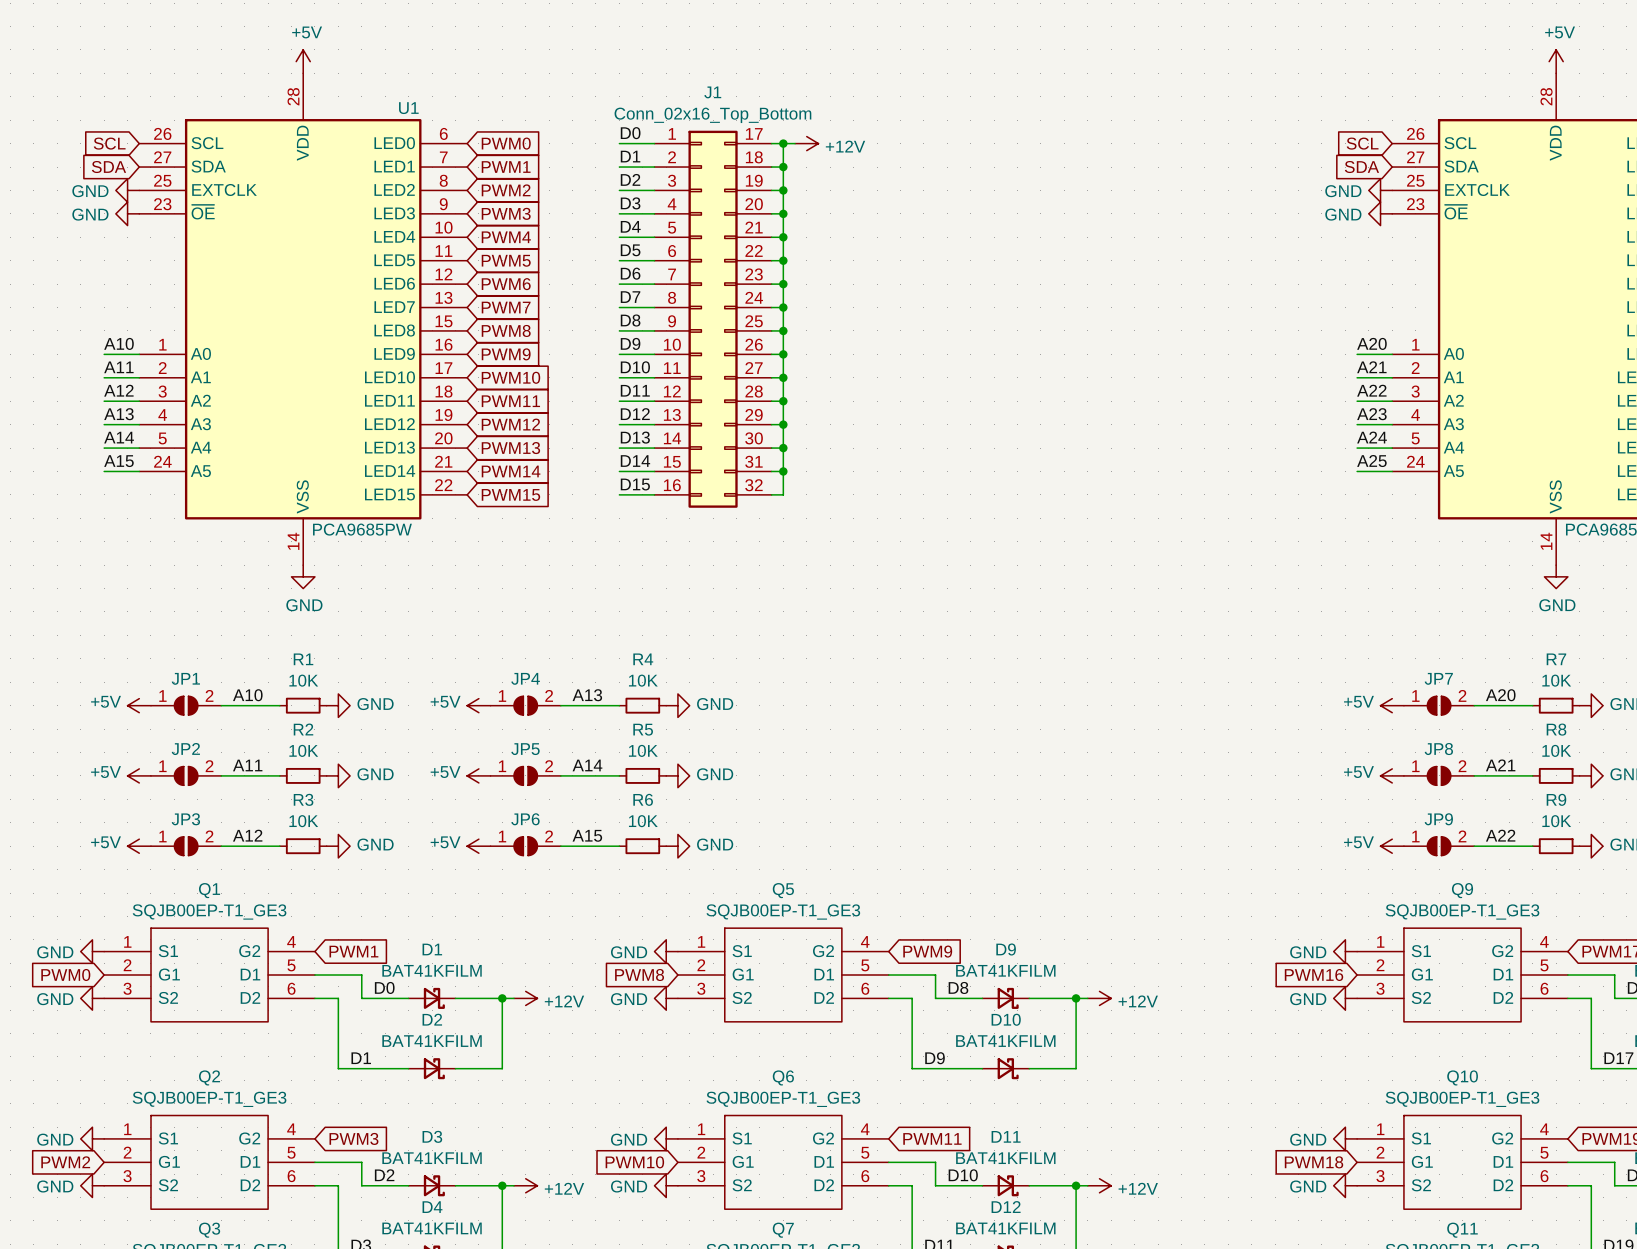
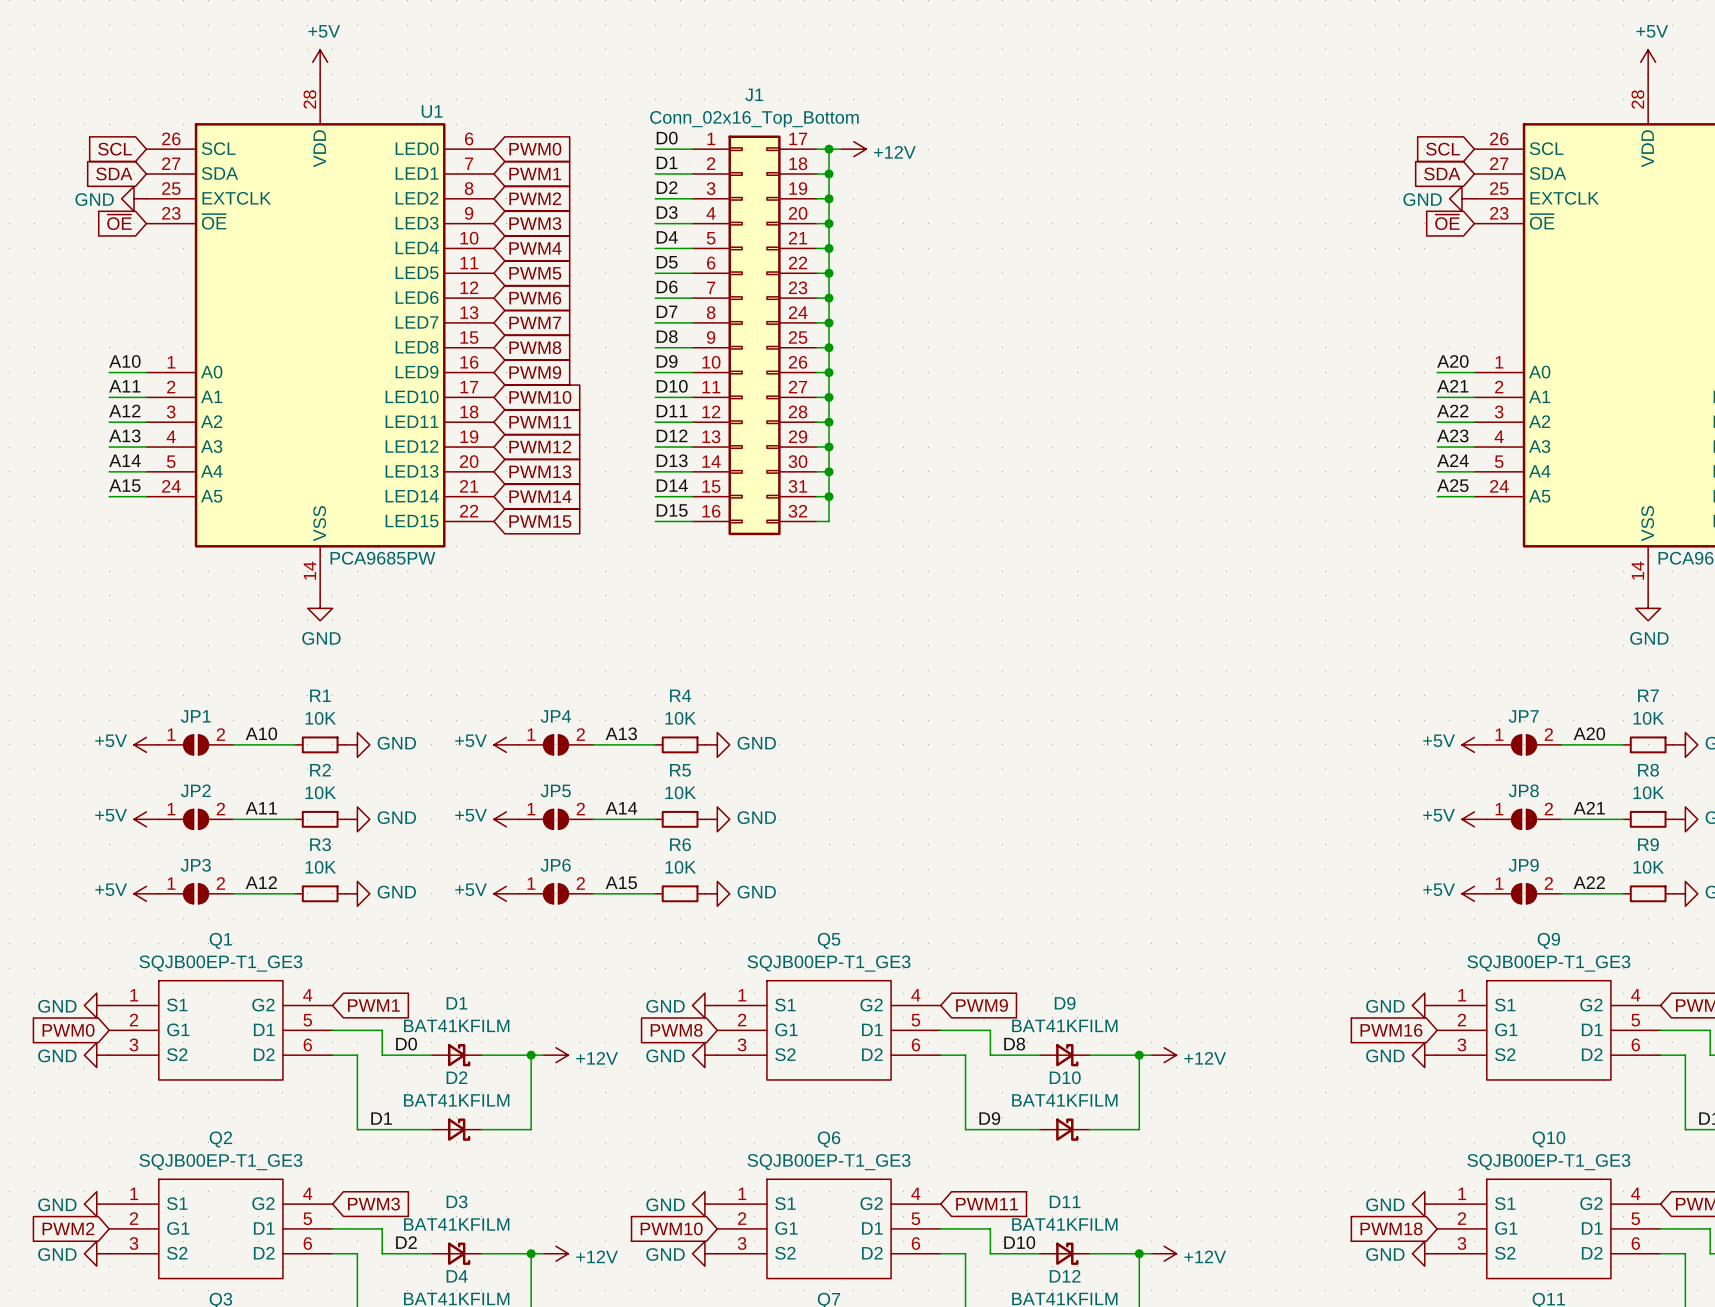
global label: none -> ~{OE} (119, 222)
global label: none -> ~{OE} (1447, 222)
power symbol: GND (127, 213) -> none
power symbol: GND (1380, 213) -> none

